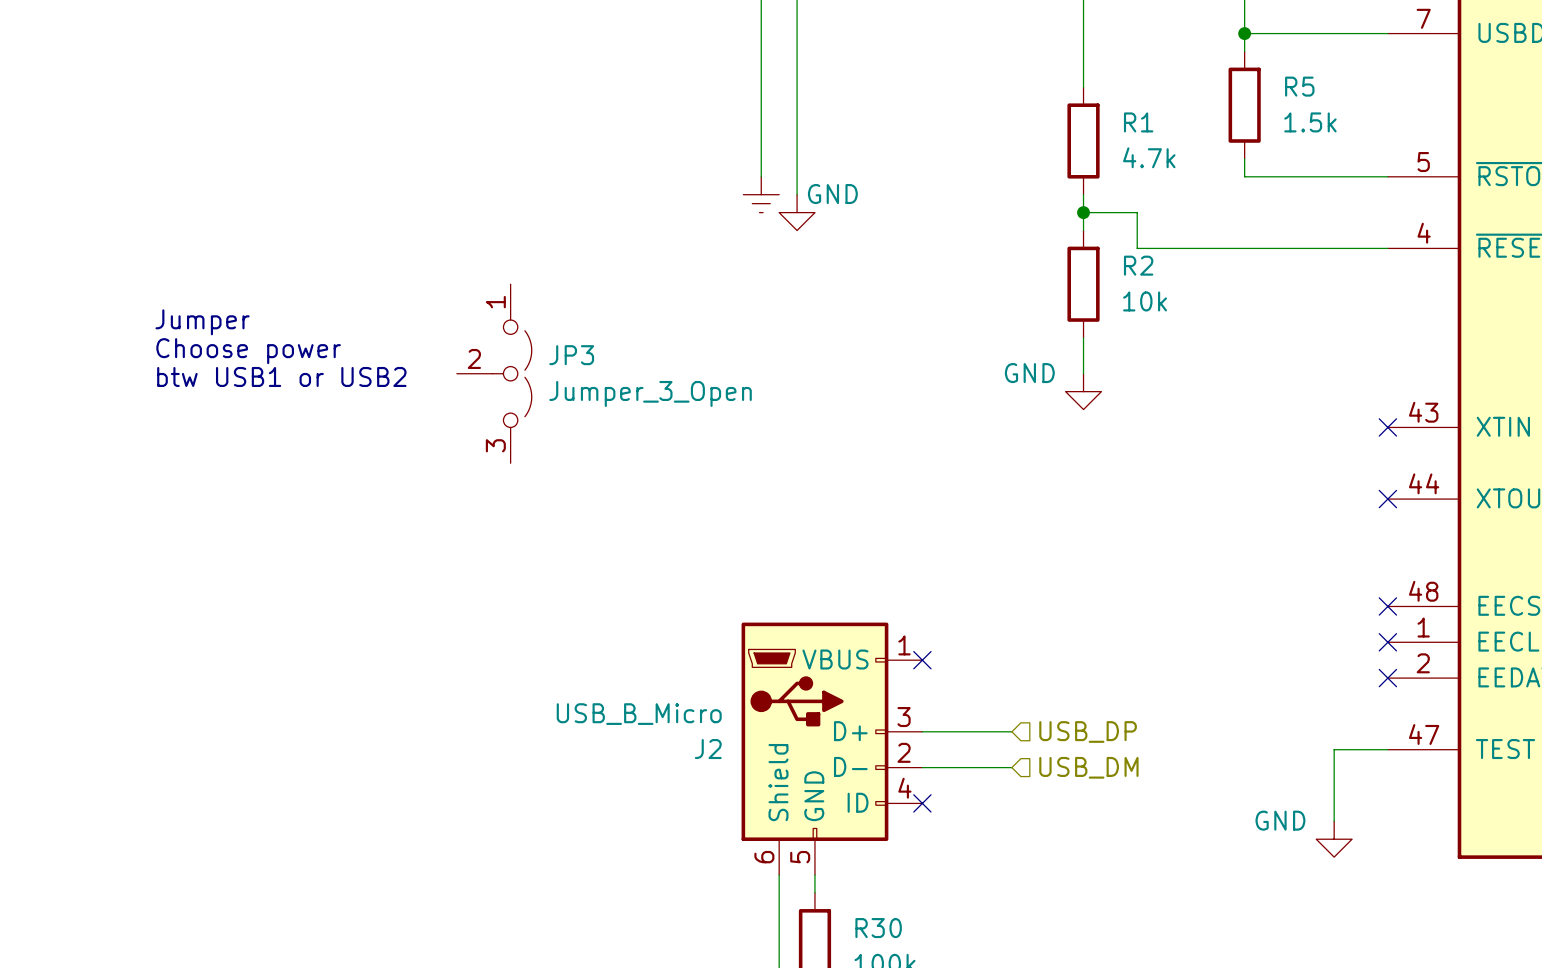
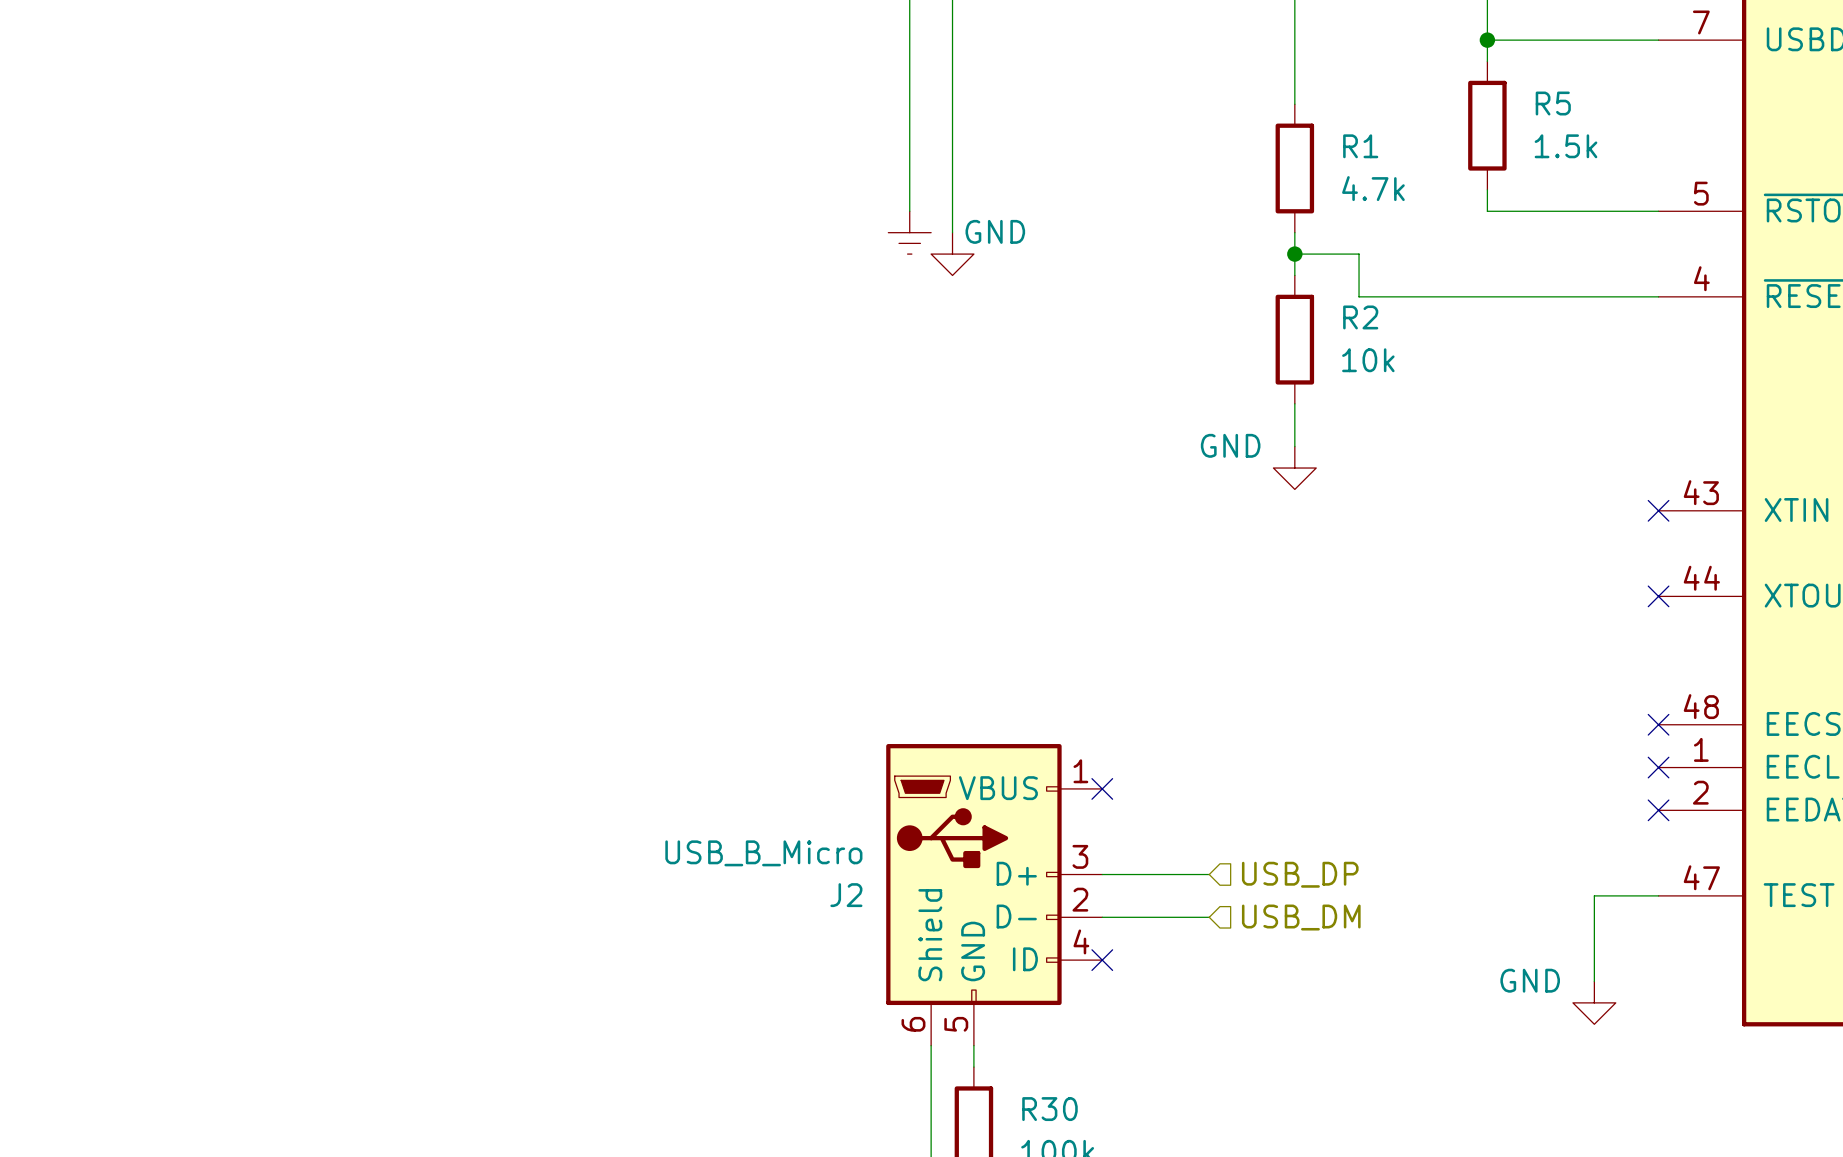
text: Jumper (202, 322) -> none
text: Choose power (248, 351) -> none
JP3: Jumper_3_Open (494, 373) -> none
text: btw USB1 or USB2 (281, 376) -> none

